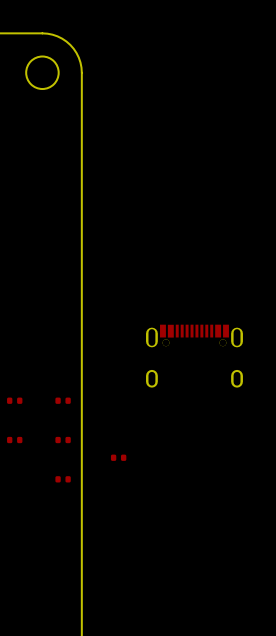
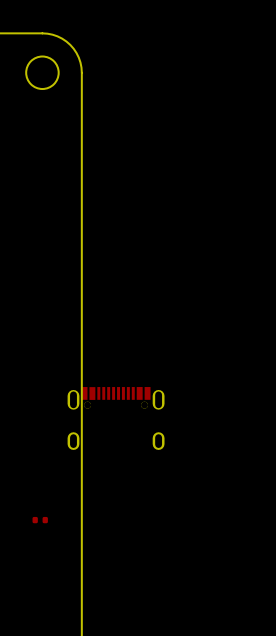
part position: (194, 356) -> (116, 418)
part: (14, 400) -> none
part: (63, 400) -> none
part: (14, 440) -> none
part: (63, 440) -> none
part: (118, 457) -> none
part: (63, 479) -> none
part: none -> (40, 520)

